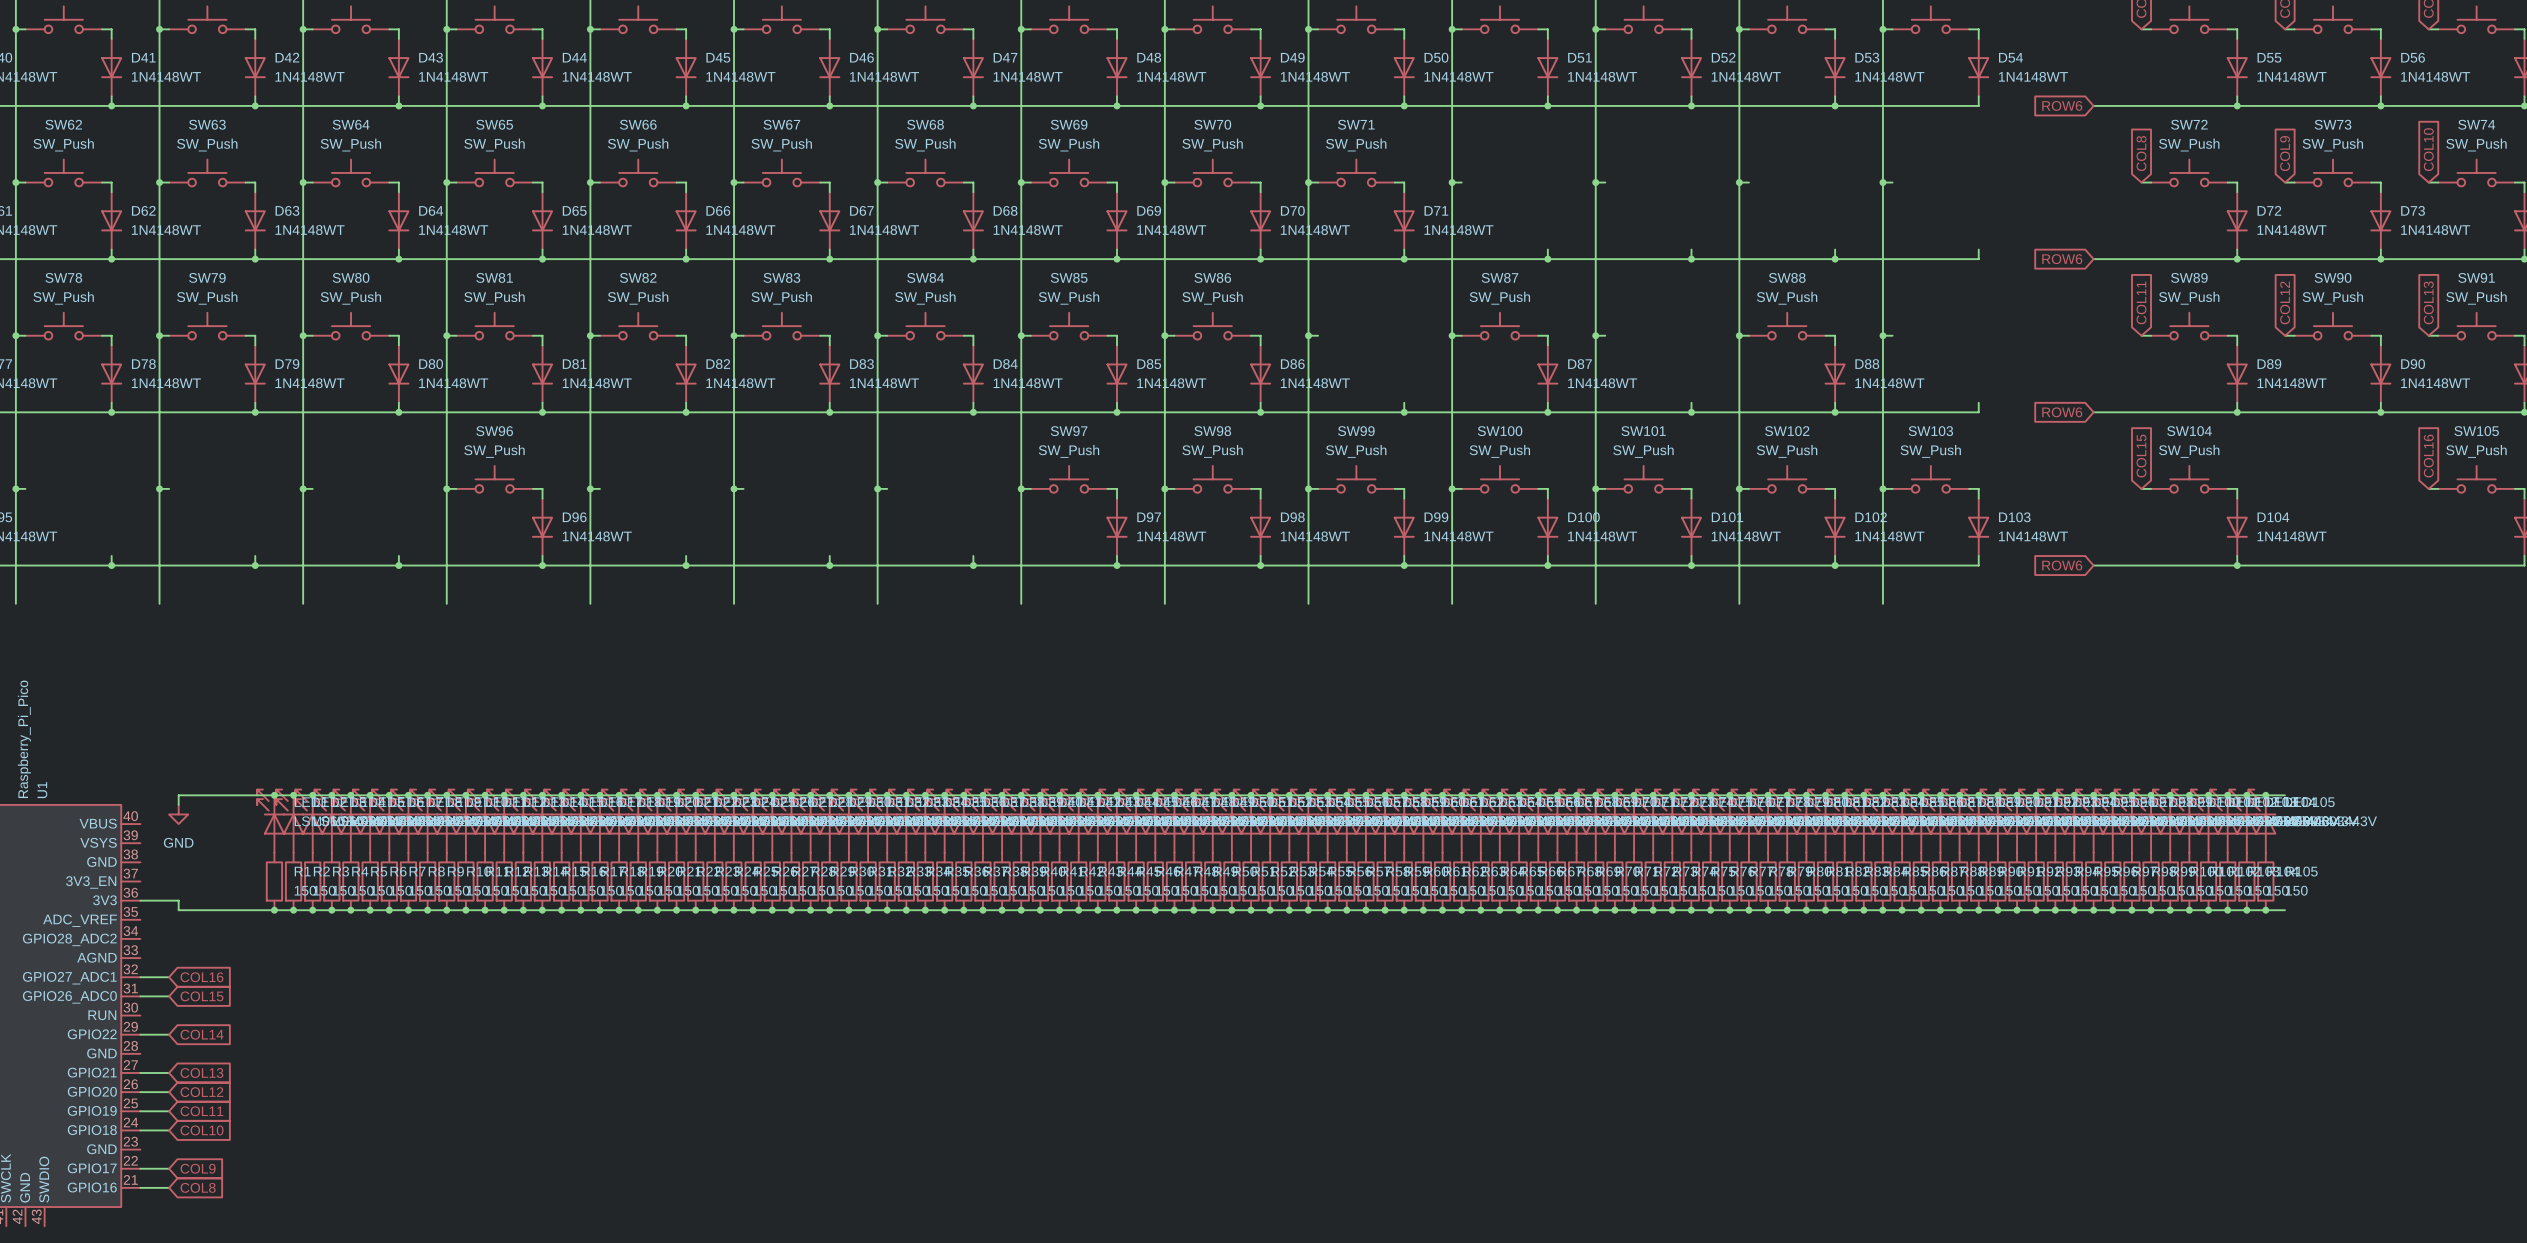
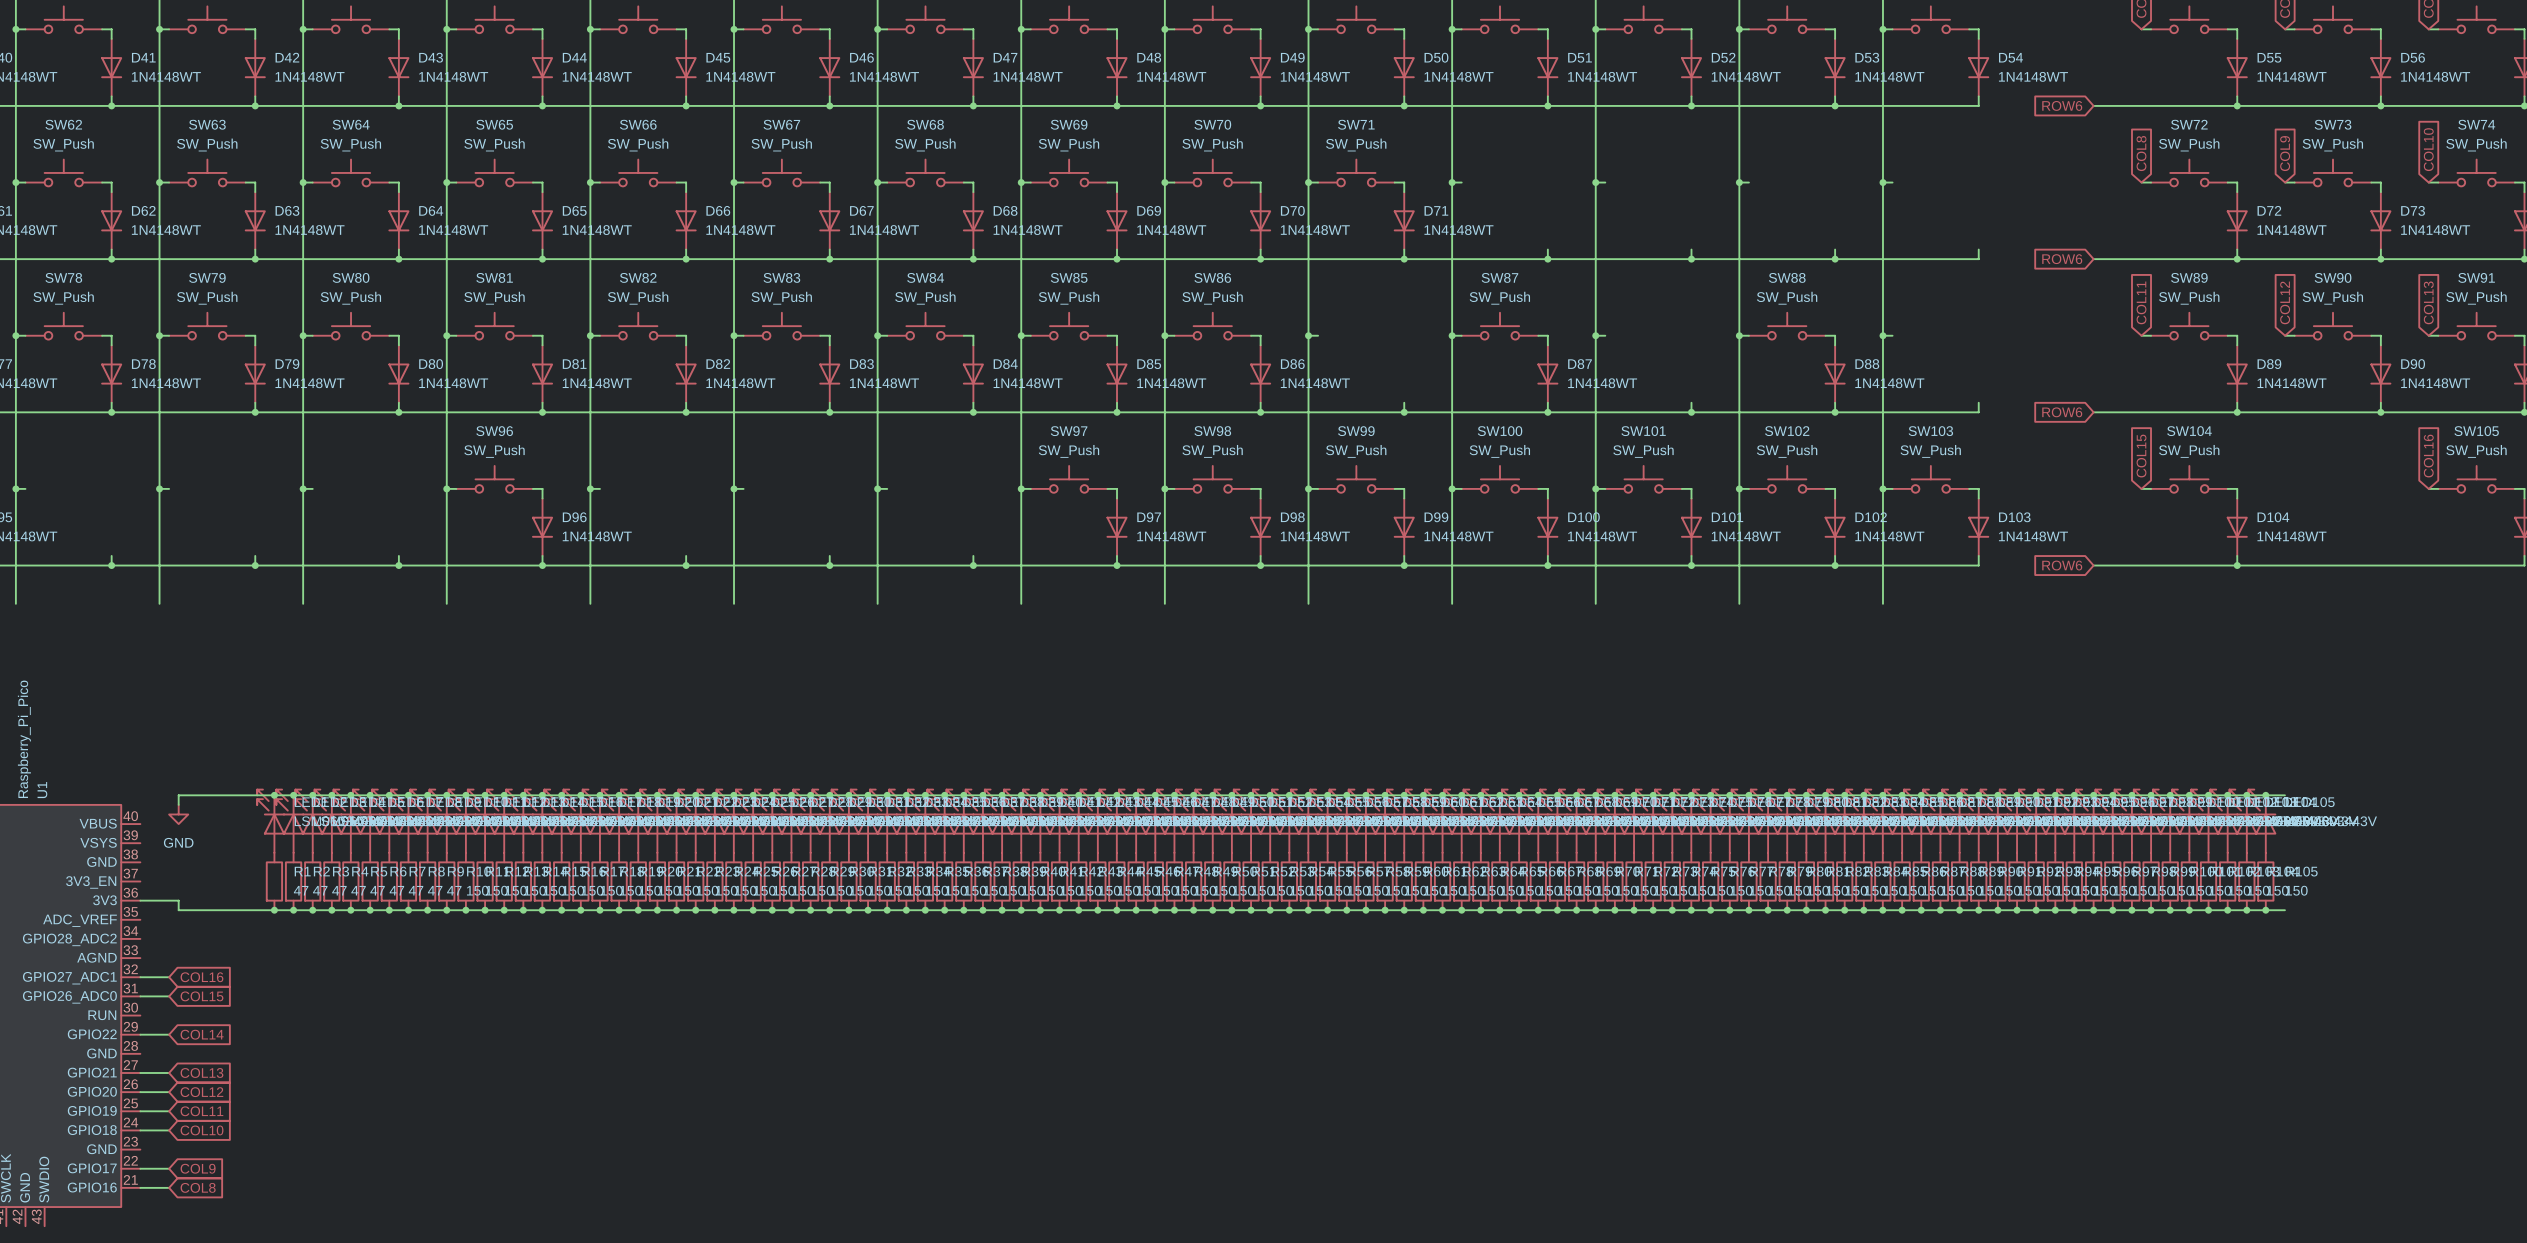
R1 value: 150 (305, 890) -> 47 (301, 890)
R2 value: 150 (324, 890) -> 47 (320, 890)
R3 value: 150 (343, 890) -> 47 (339, 890)
R4 value: 150 (362, 890) -> 47 (358, 890)
R5 value: 150 (381, 890) -> 47 (377, 890)
R6 value: 150 (401, 890) -> 47 (396, 890)
R7 value: 150 (420, 890) -> 47 (416, 890)
R8 value: 150 (439, 890) -> 47 (435, 890)
R9 value: 150 (458, 890) -> 47 (454, 890)

